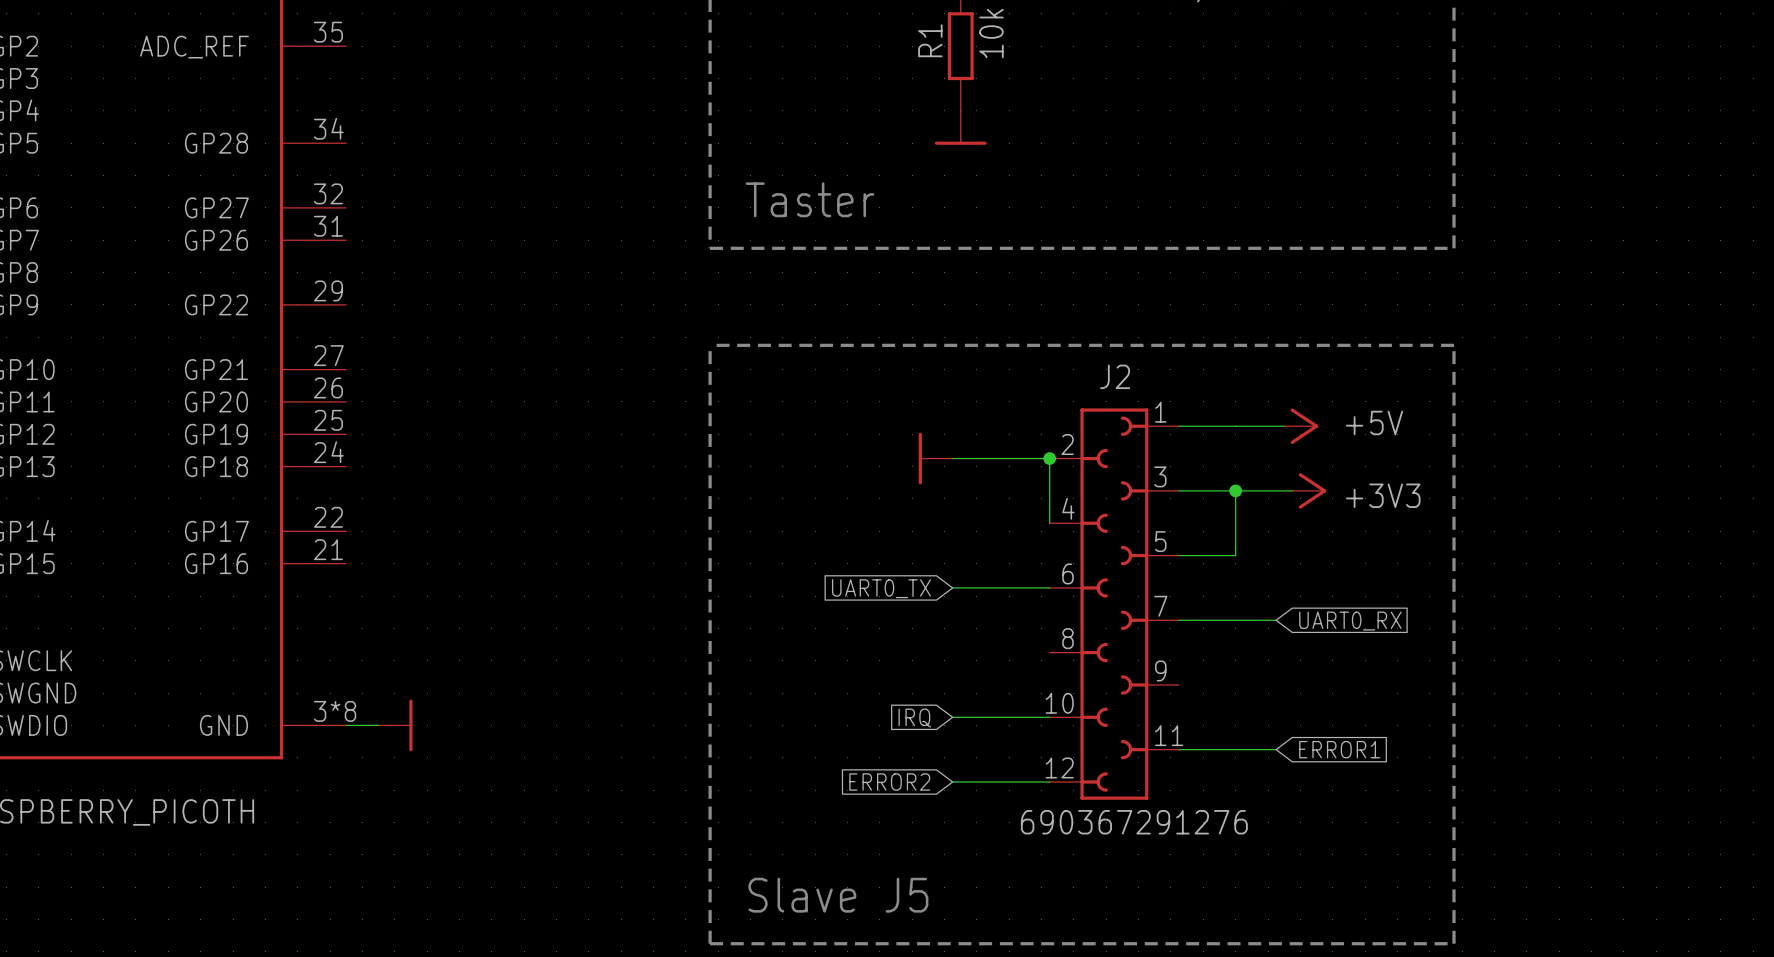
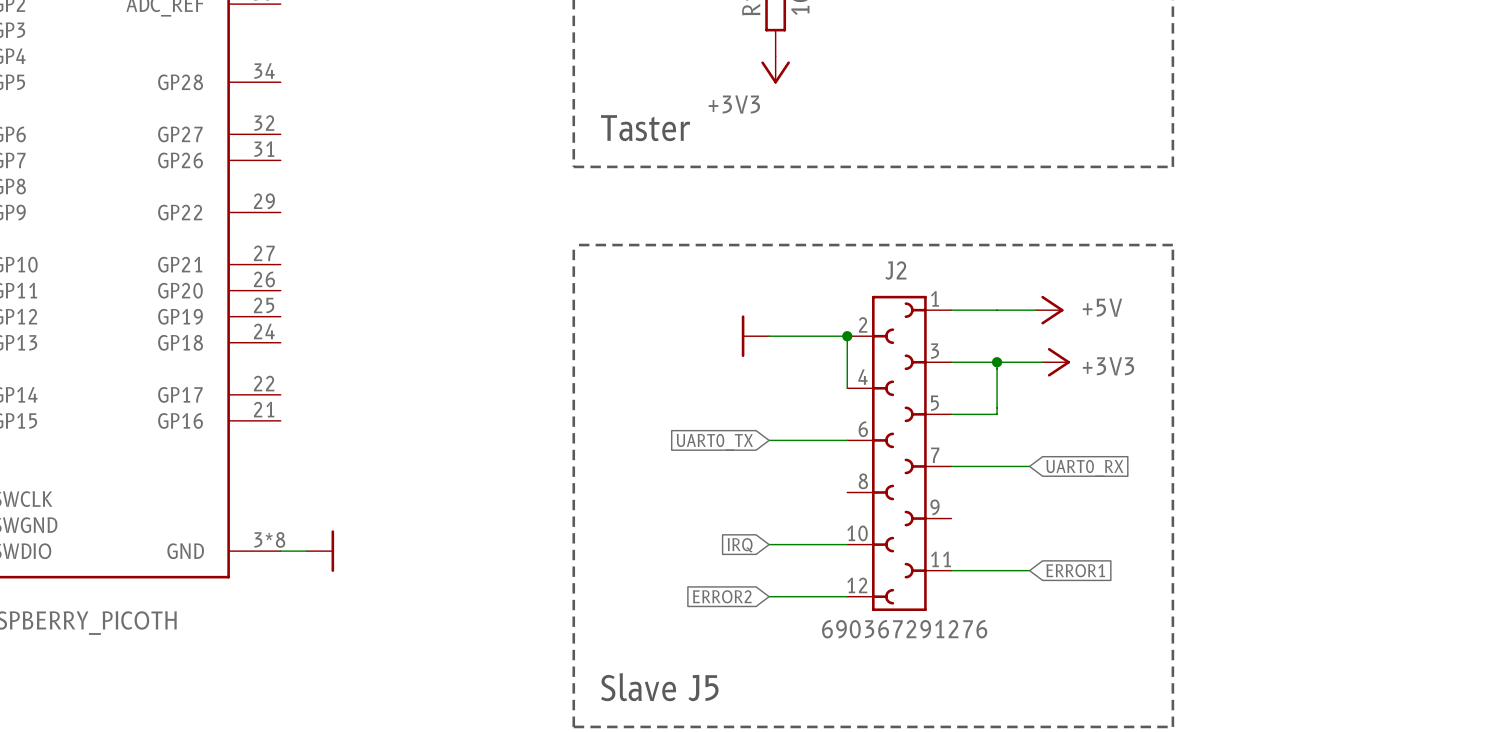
power symbol shape: [934, 110, 987, 145] -> [761, 56, 790, 84]
power symbol text: none -> +3V3 (734, 104)

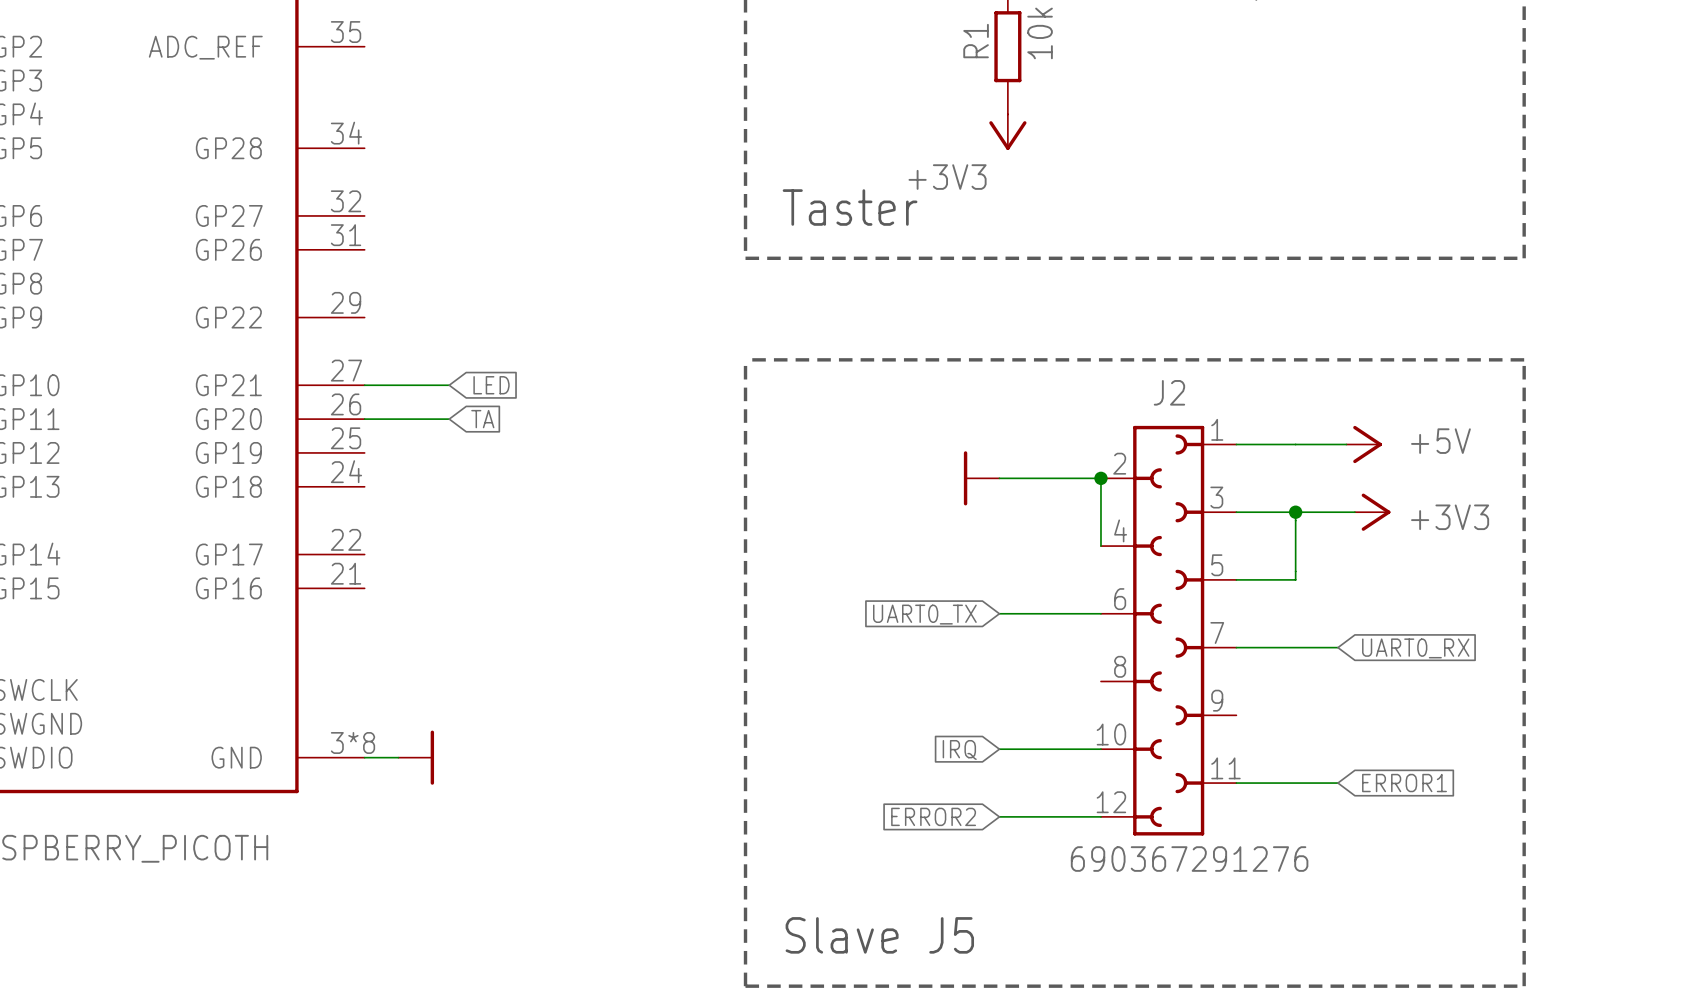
wire: none -> (364, 385) (449, 385)
global label: none -> LED (491, 385)
wire: none -> (364, 419) (449, 419)
global label: none -> TA (482, 419)

